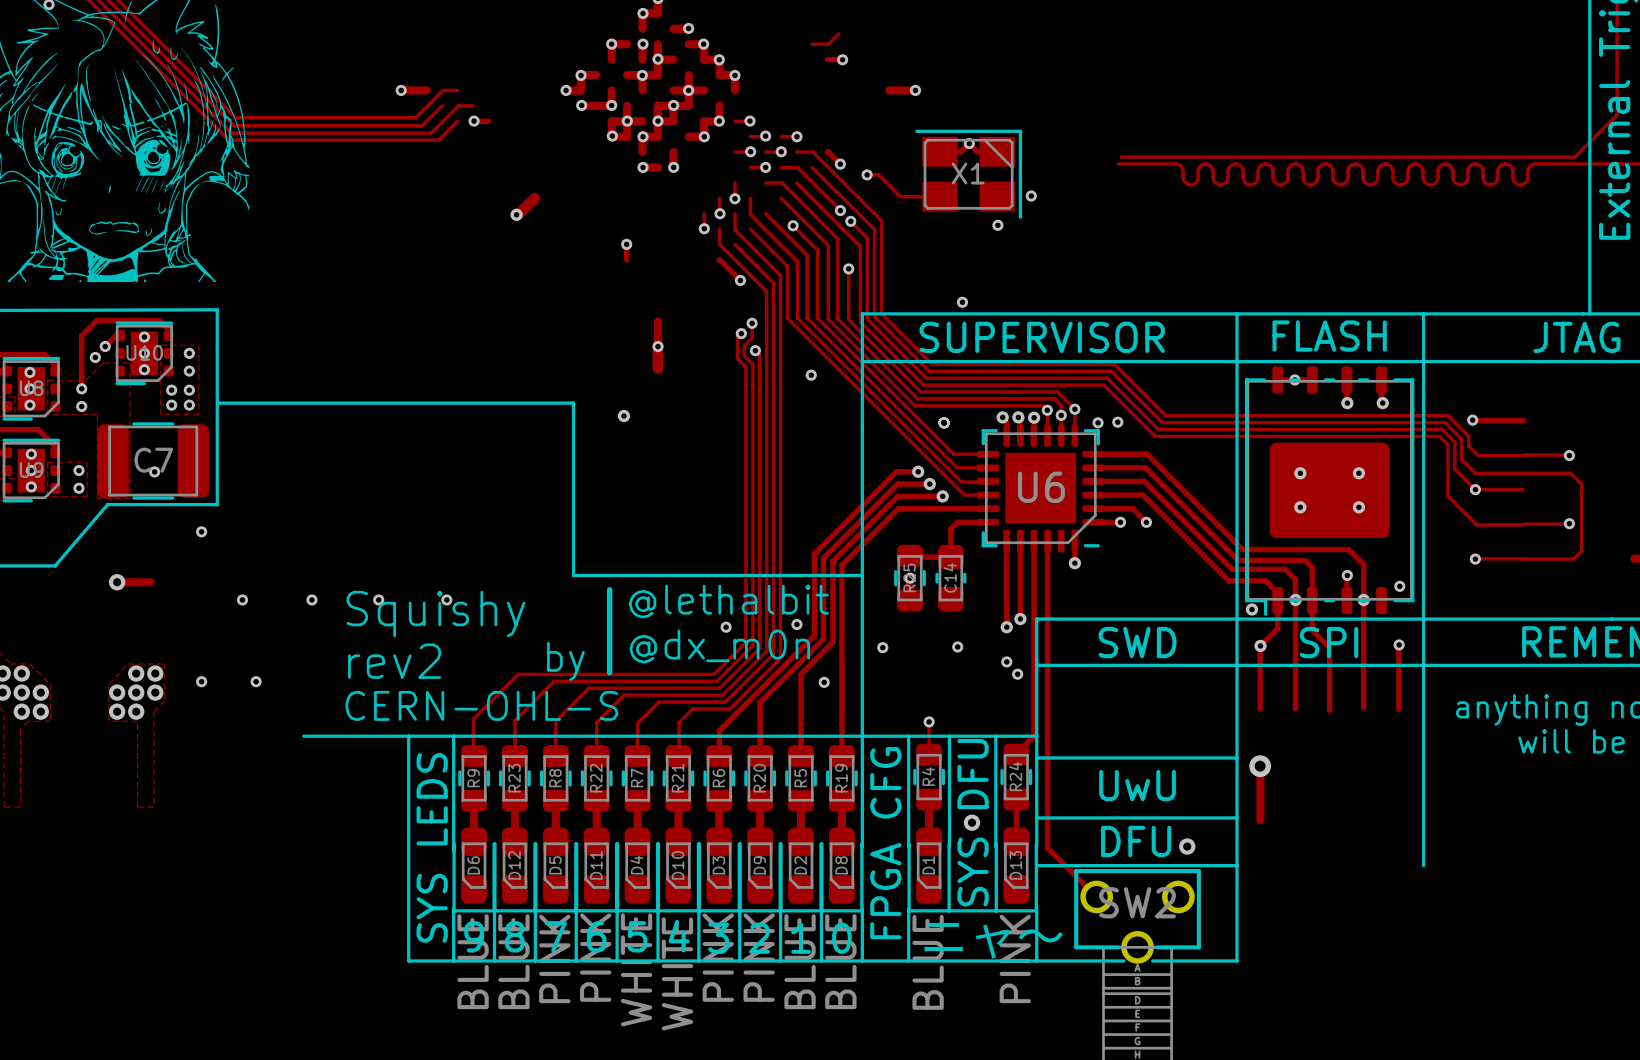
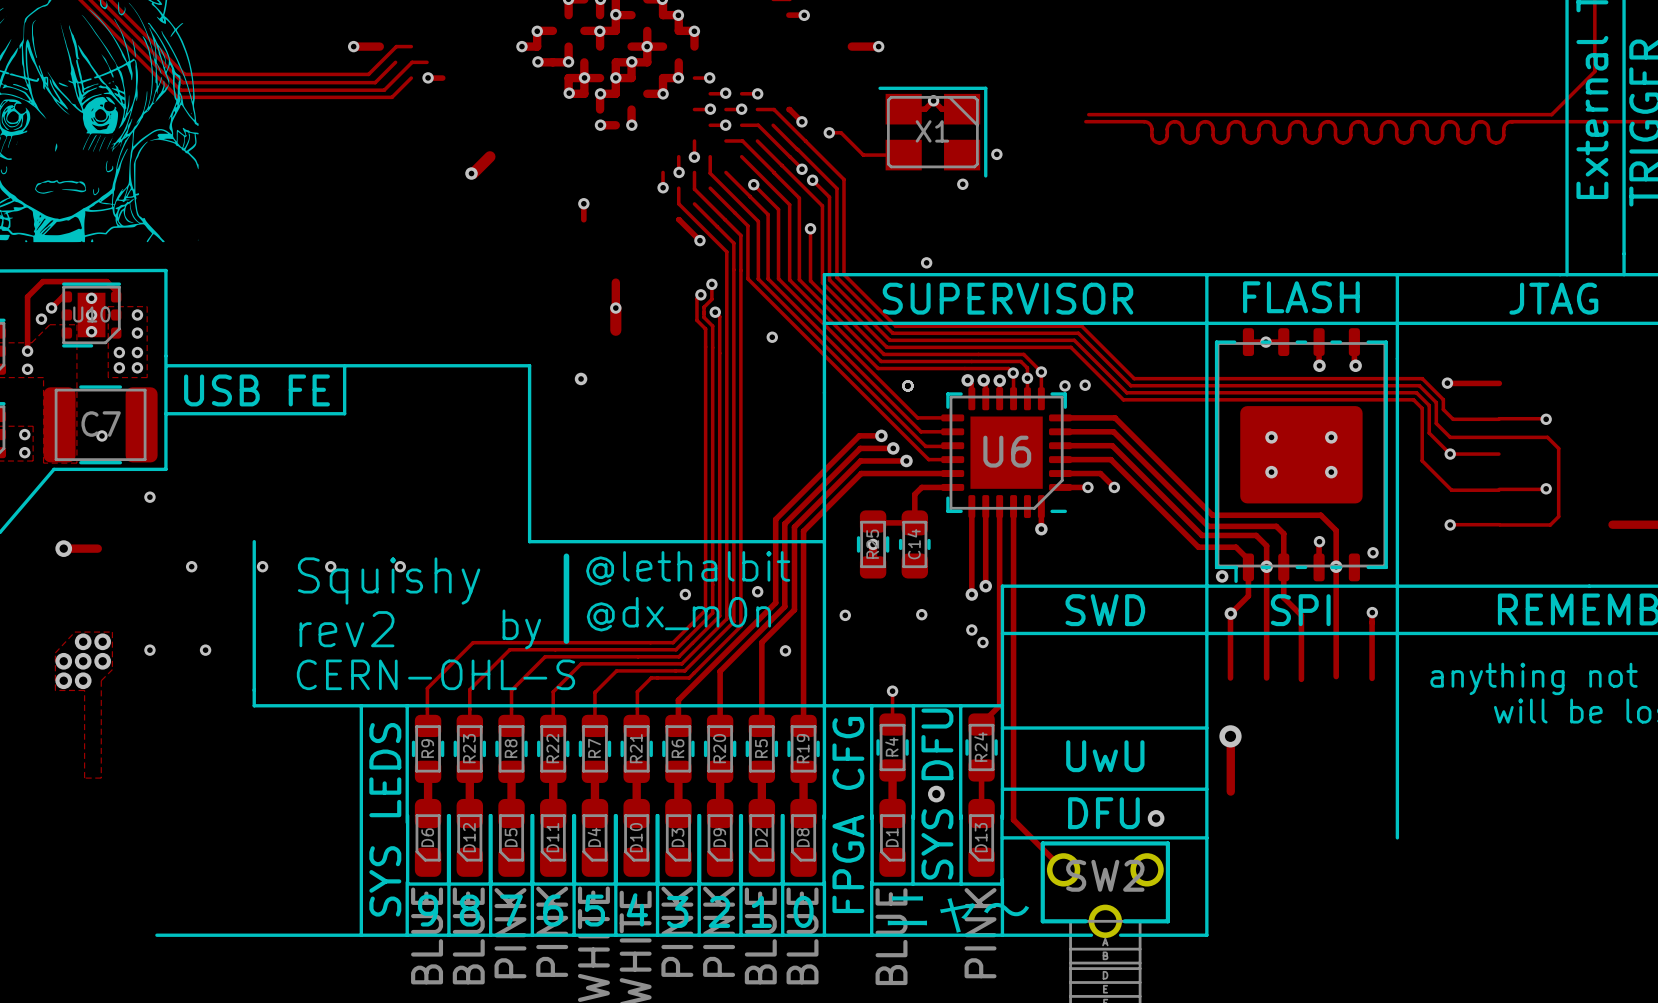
line: none -> (344, 366) (344, 413) (165, 413)
text: none -> USB FE (257, 390)
line: none -> (254, 541) (254, 705)
line: none -> (156, 935) (361, 935)

